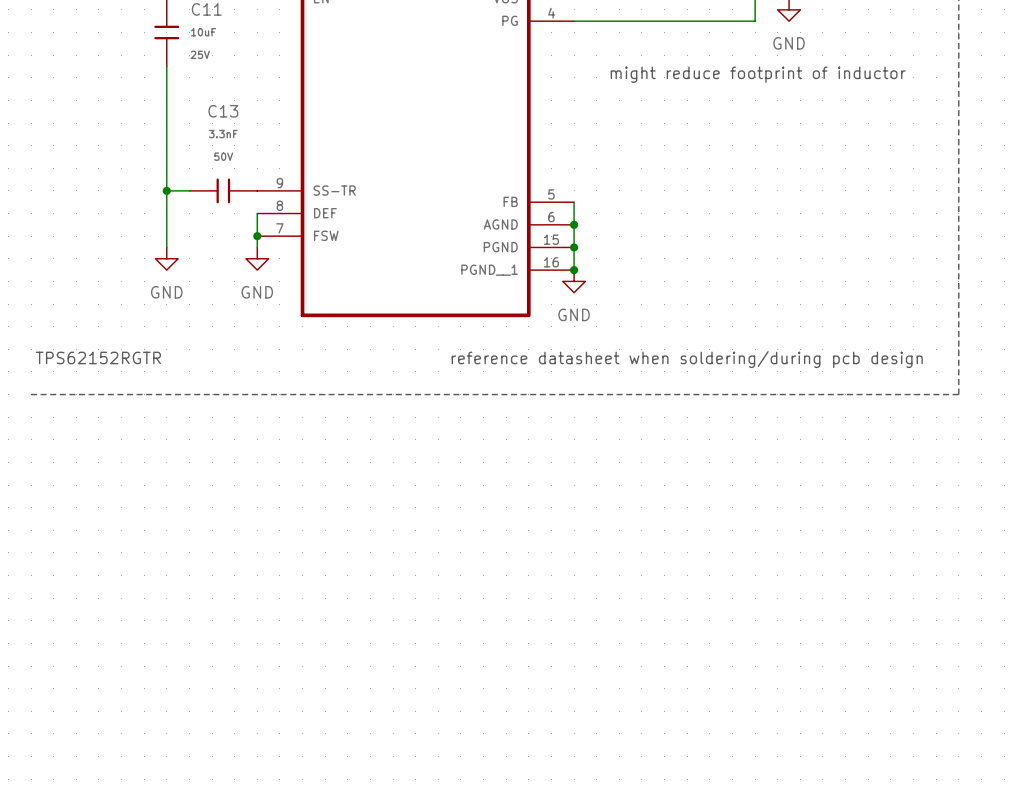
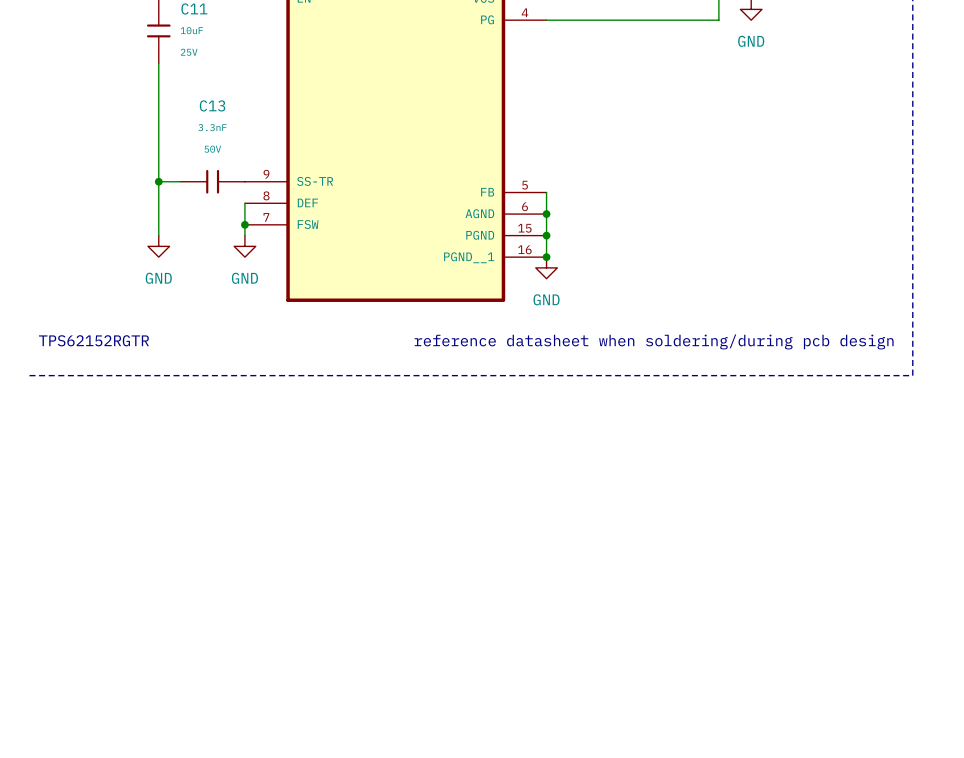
text: might reduce footprint of inductor (758, 74) -> none

